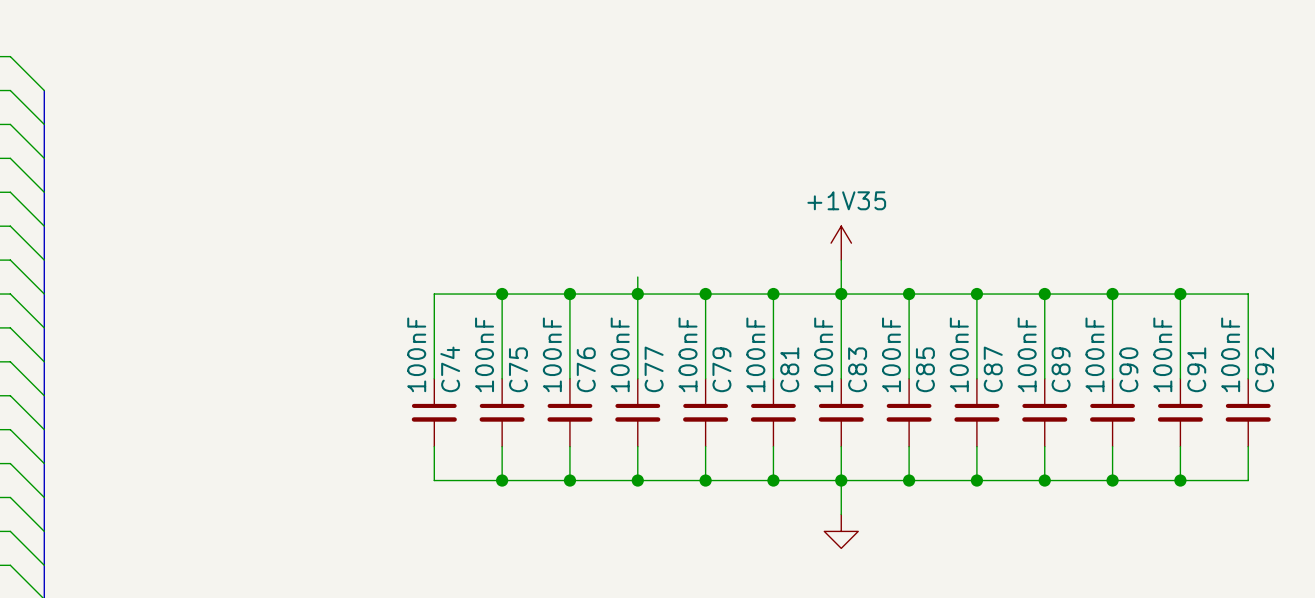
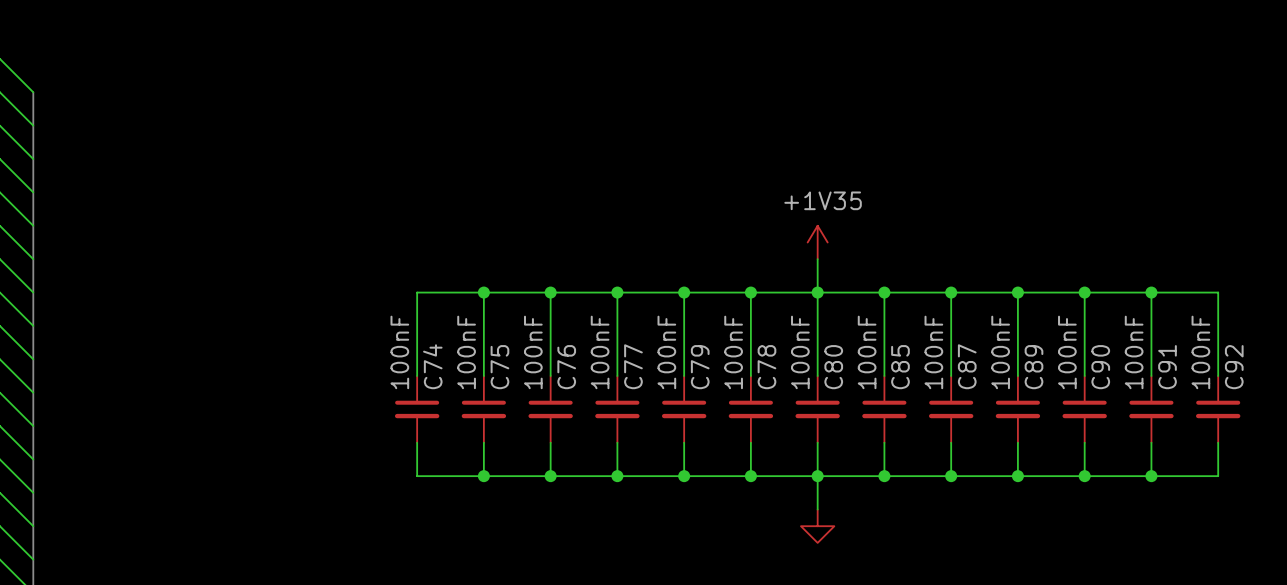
wire: (637, 277) (637, 294) -> none
C81 name: C81 (789, 369) -> C78 (766, 367)
C83 name: C83 (857, 369) -> C80 (833, 367)

